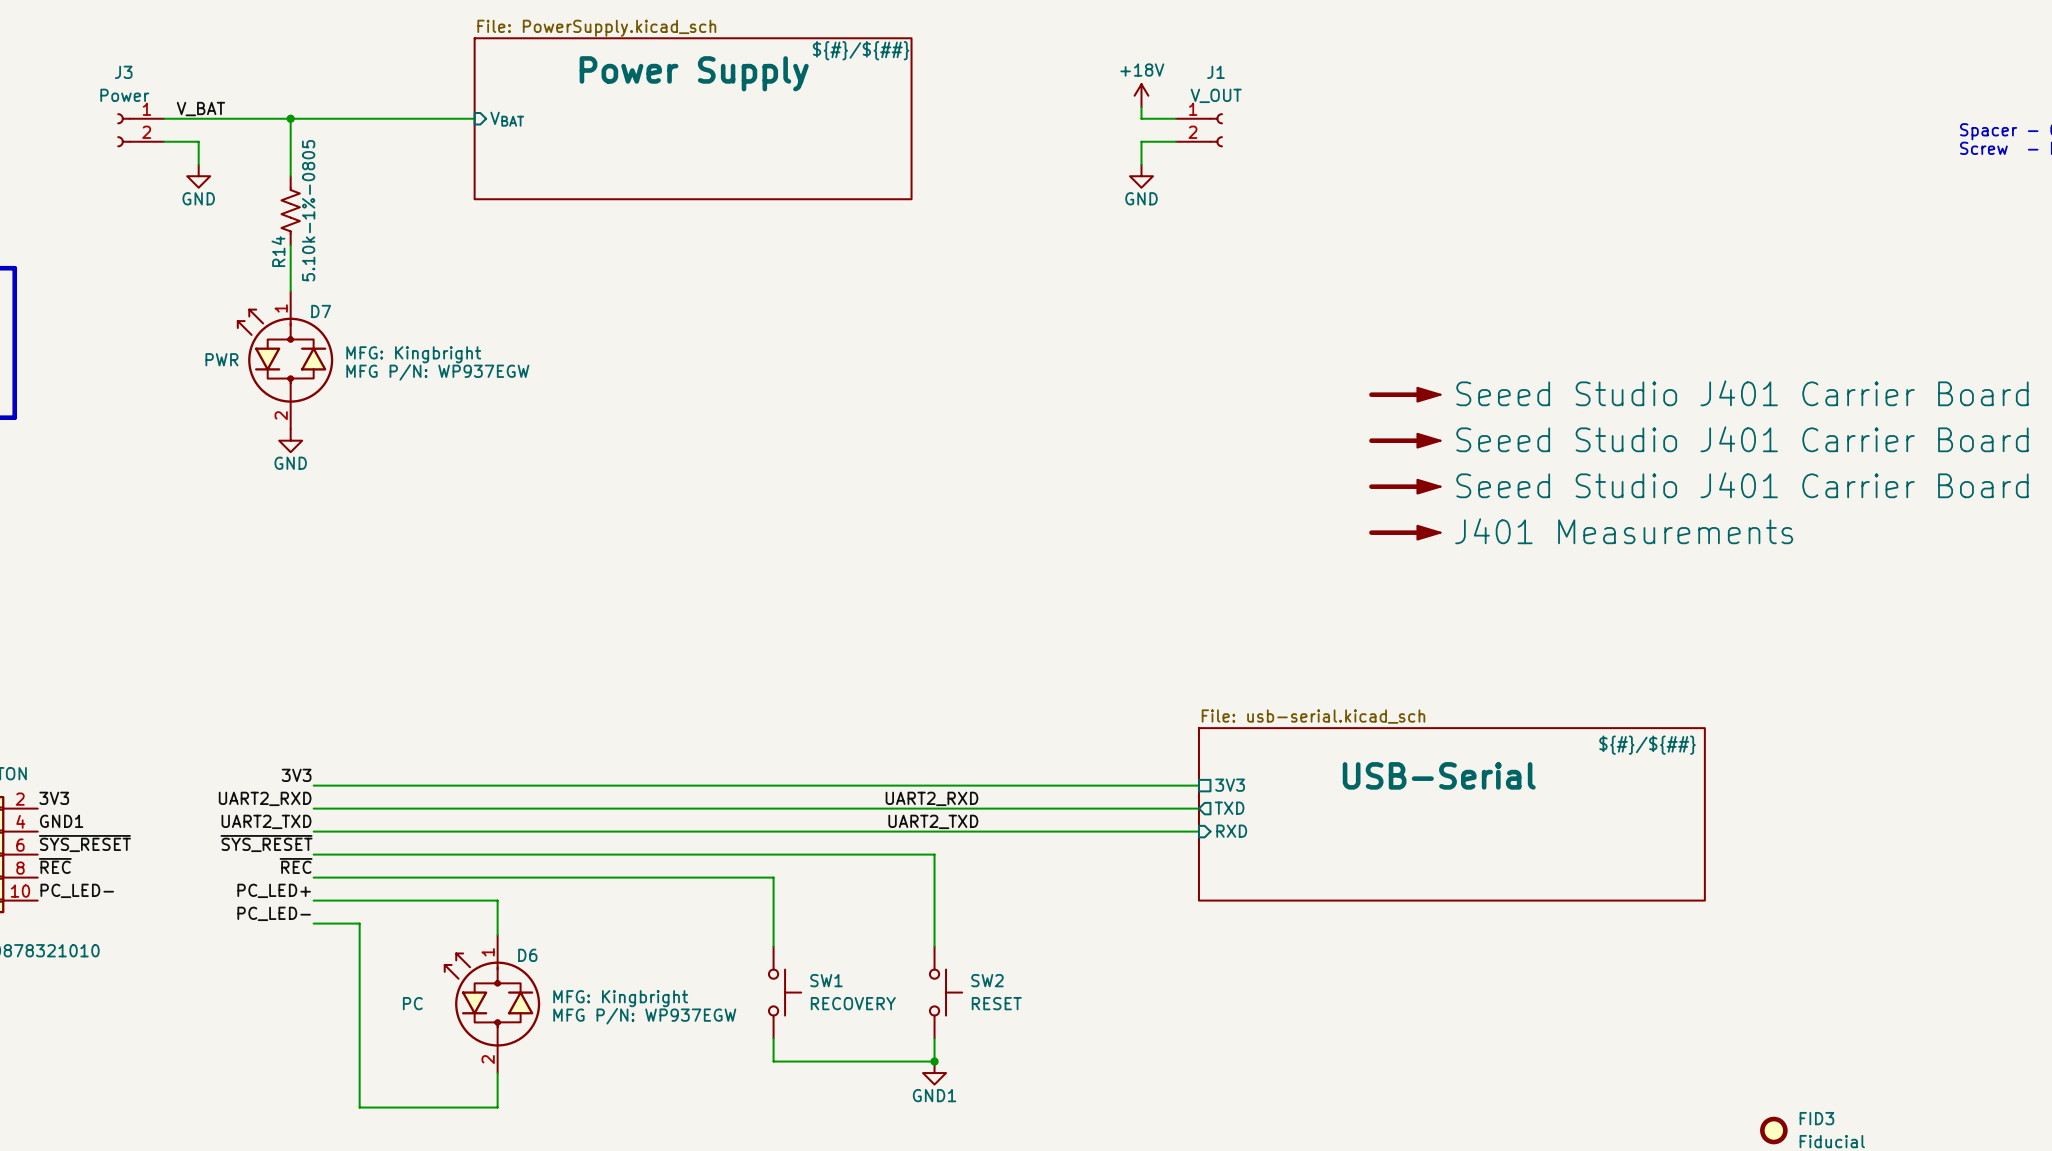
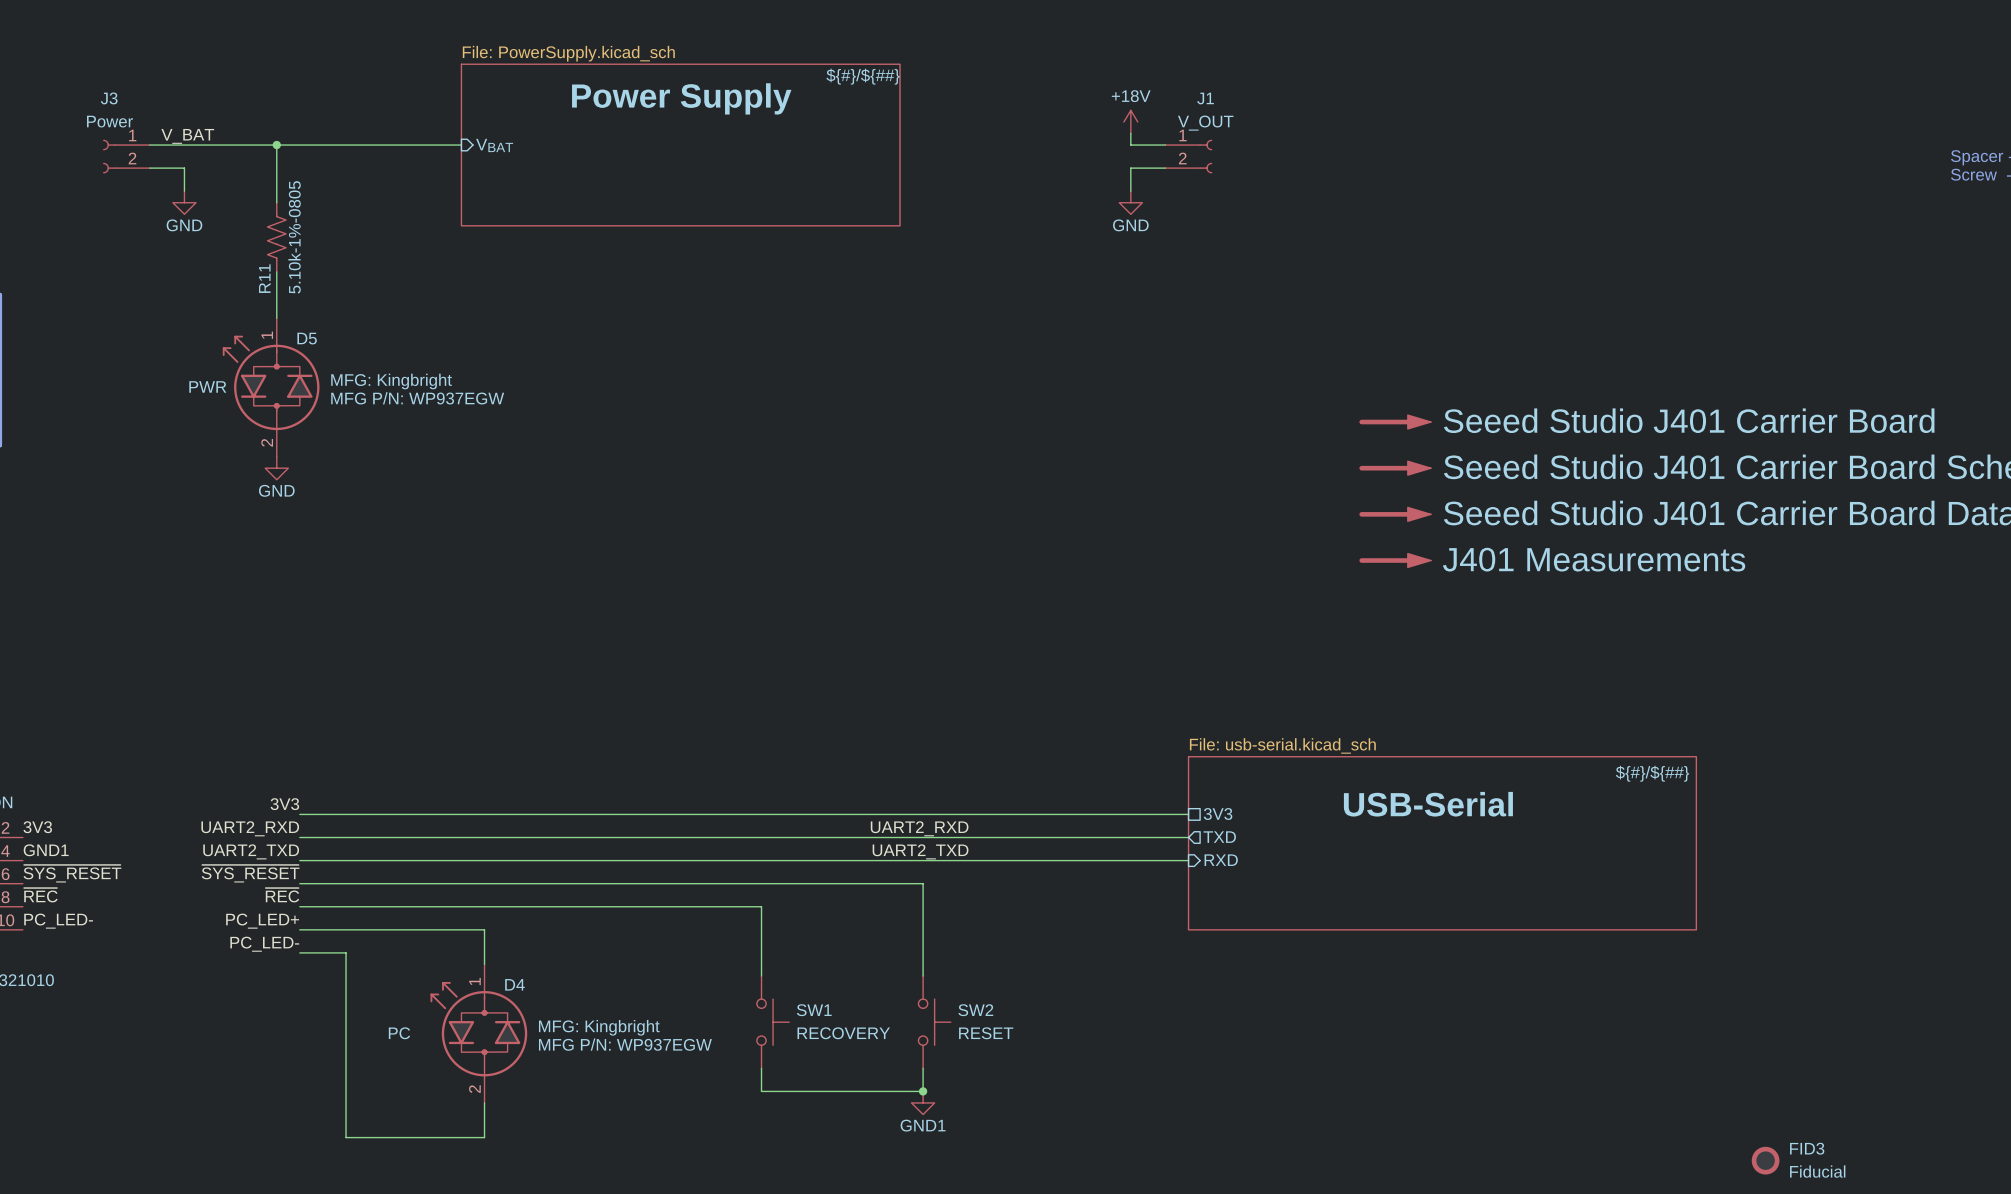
R14 name: R14 (278, 251) -> R11 (264, 278)
D7 name: D7 (321, 311) -> D5 (307, 338)
D6 name: D6 (527, 955) -> D4 (514, 984)

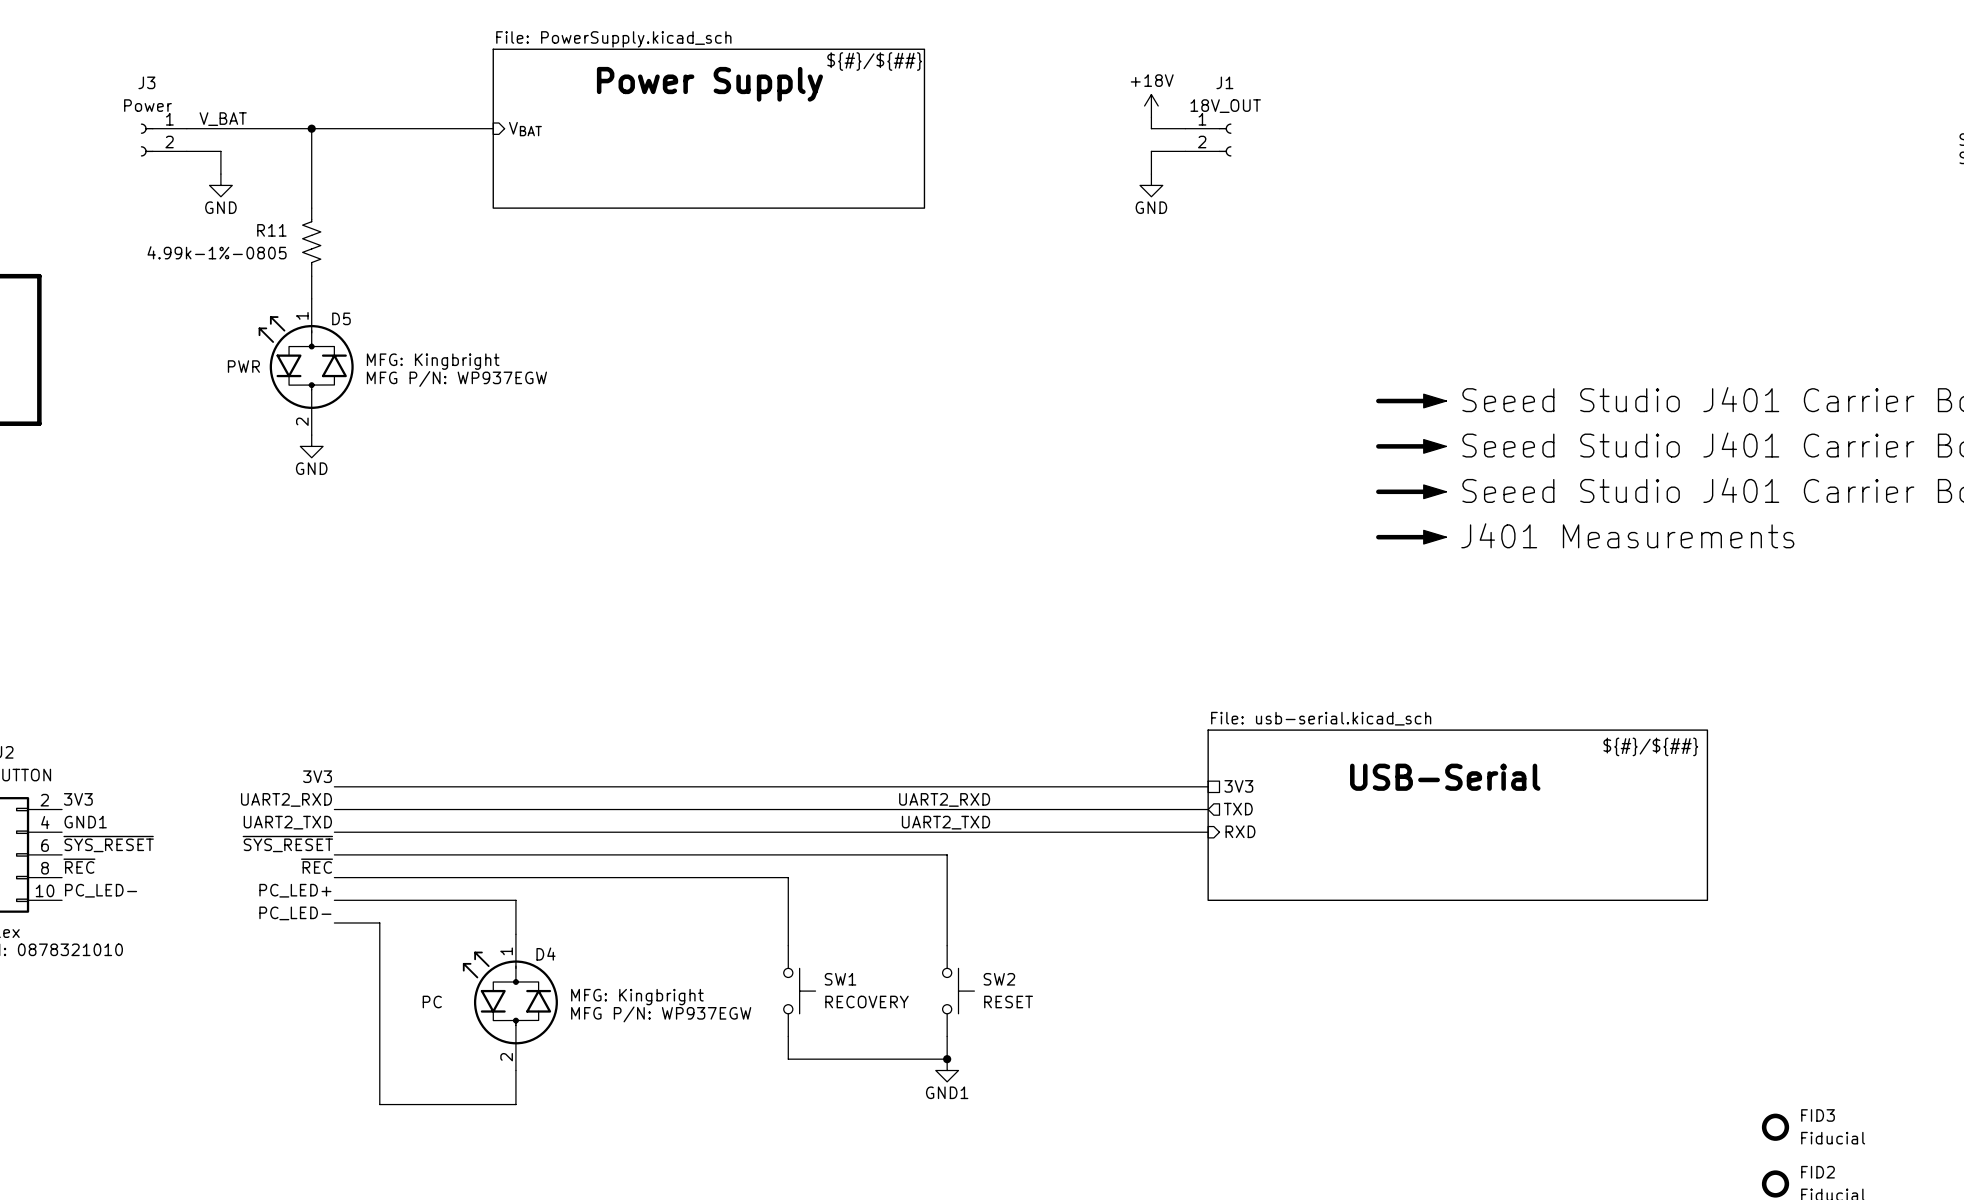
J1 value: V_OUT (1205, 123) -> 18V_OUT (1225, 106)
R11 flip: as is (276, 237) -> left-right (311, 242)
R11 value: 5.10k-1%-0805 (294, 237) -> 4.99k-1%-0805 (217, 252)
R11 name position: R11 (264, 278) -> R11 (271, 230)

